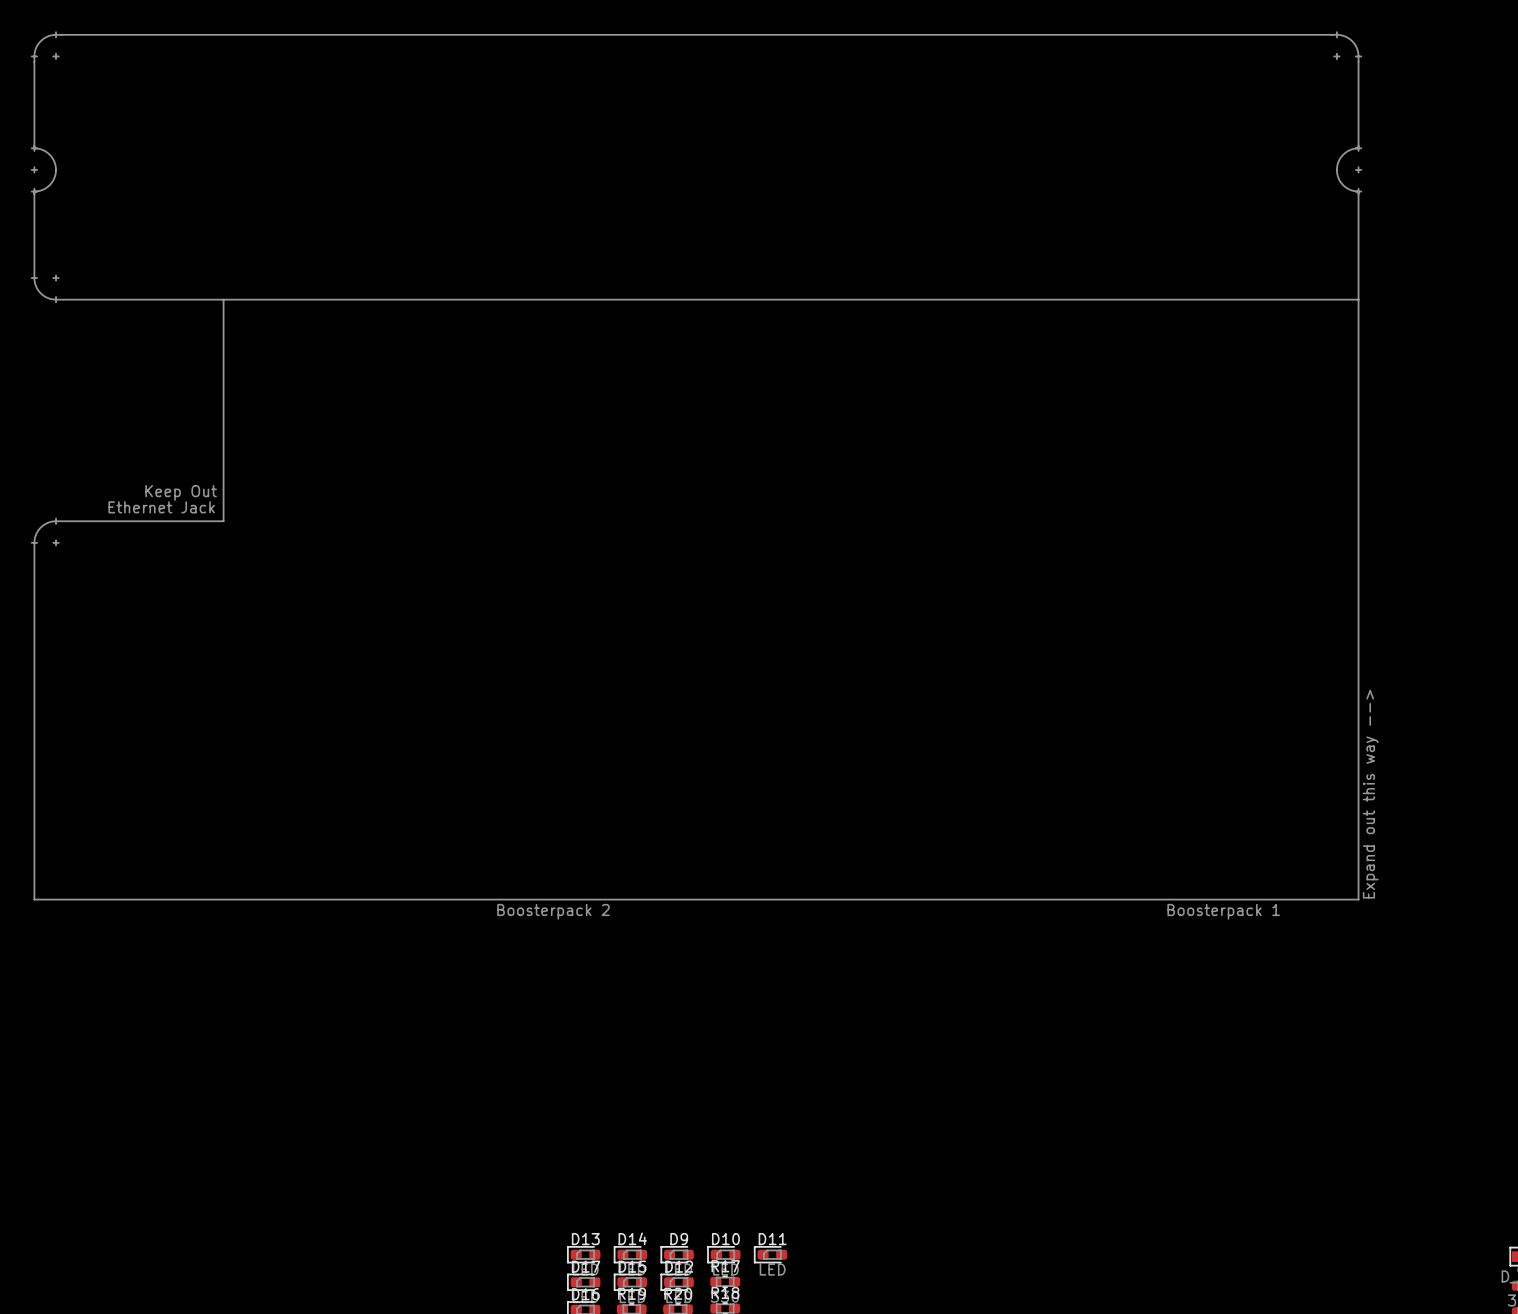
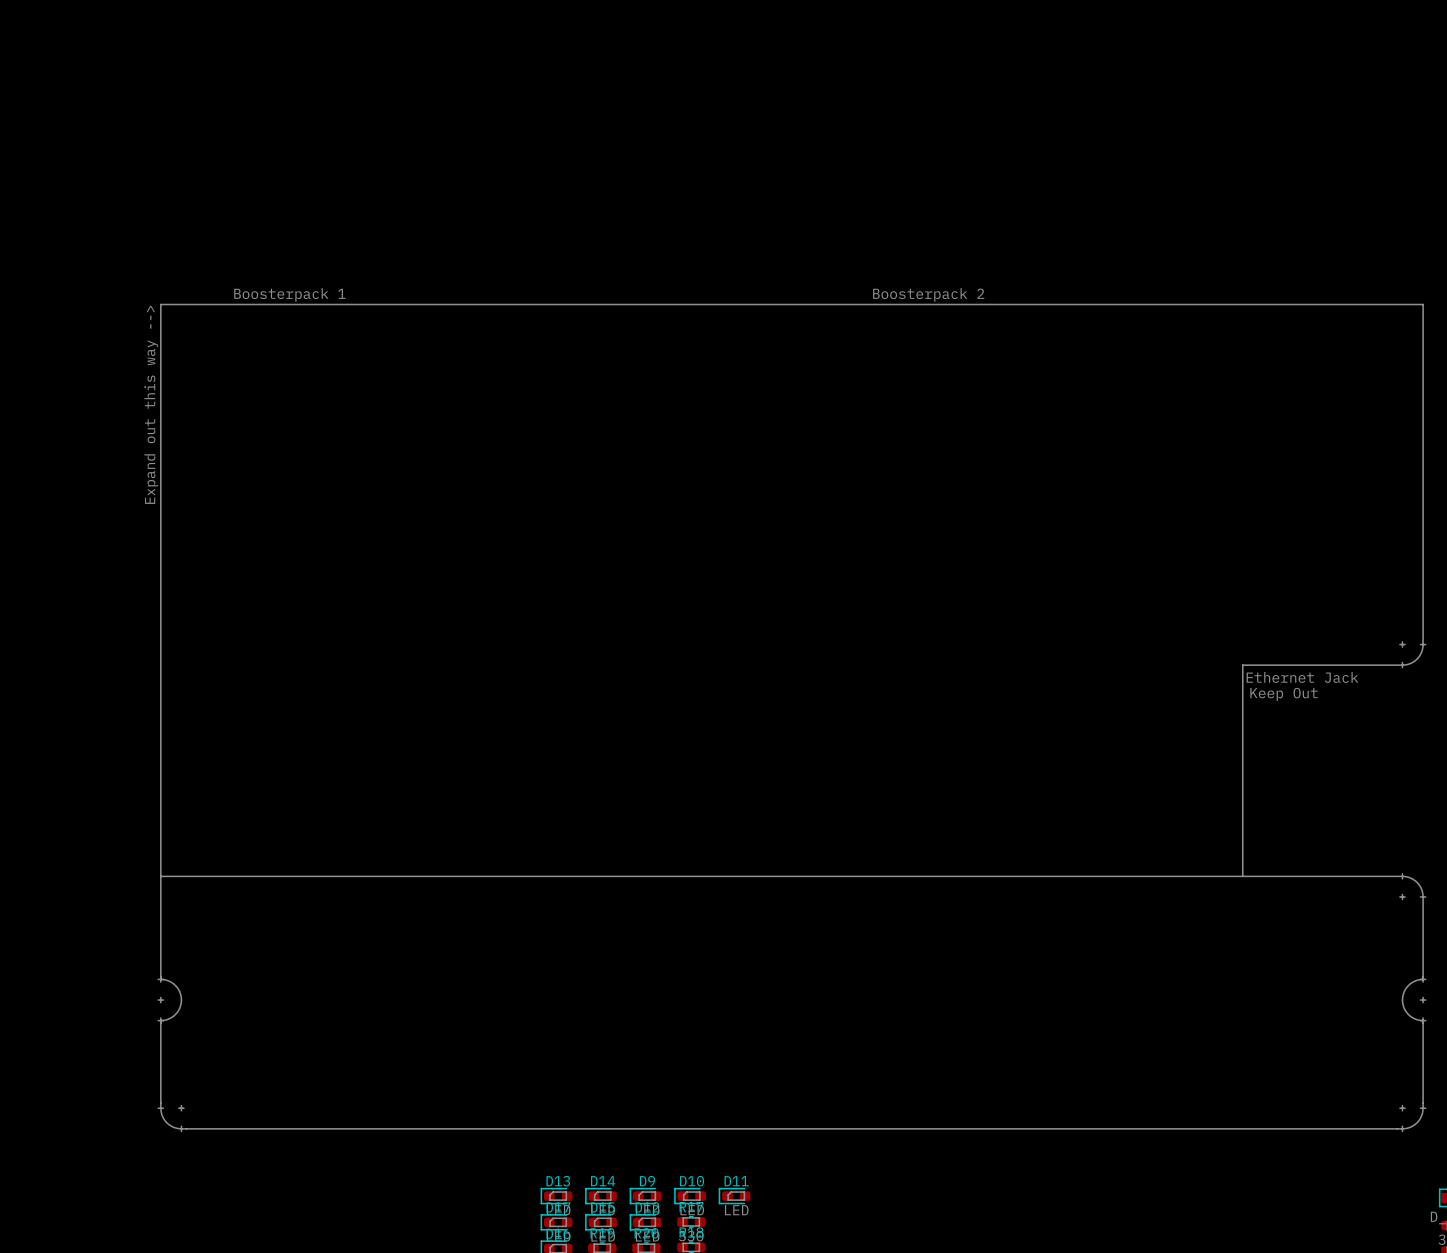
part: (696, 466) -> none
part: none -> (791, 717)

